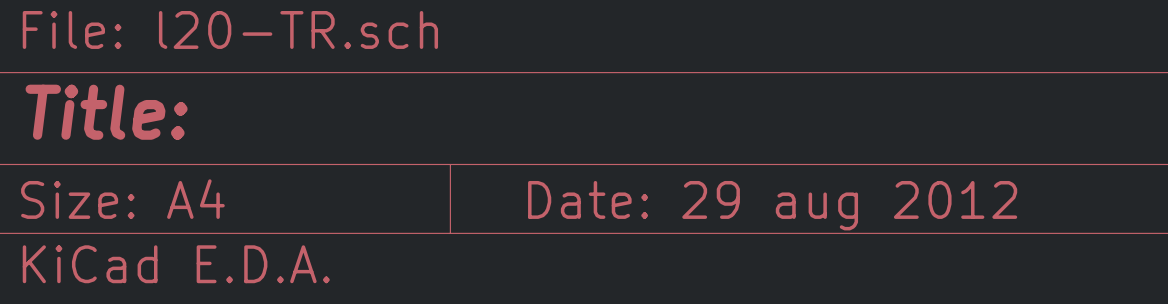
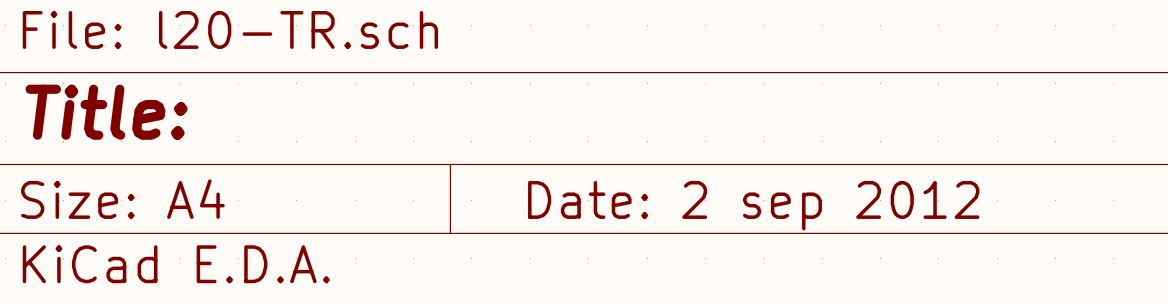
title block: Date: 29 aug 2012 (772, 205) -> Date: 2 sep 2012 (753, 205)

